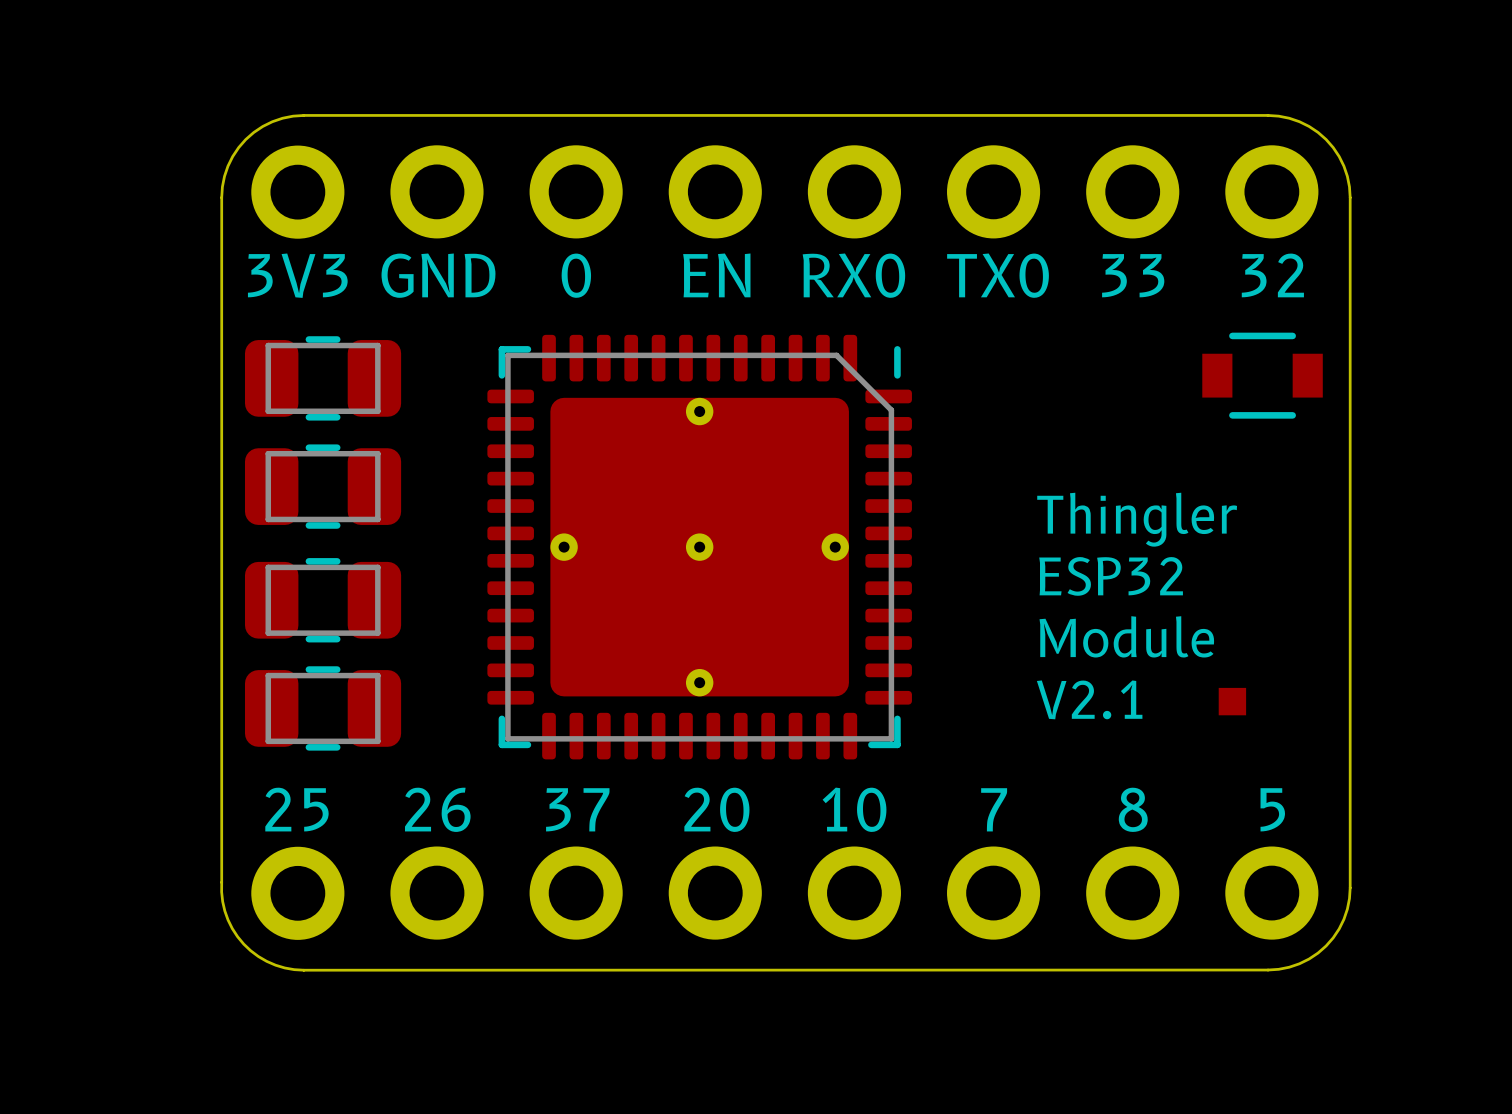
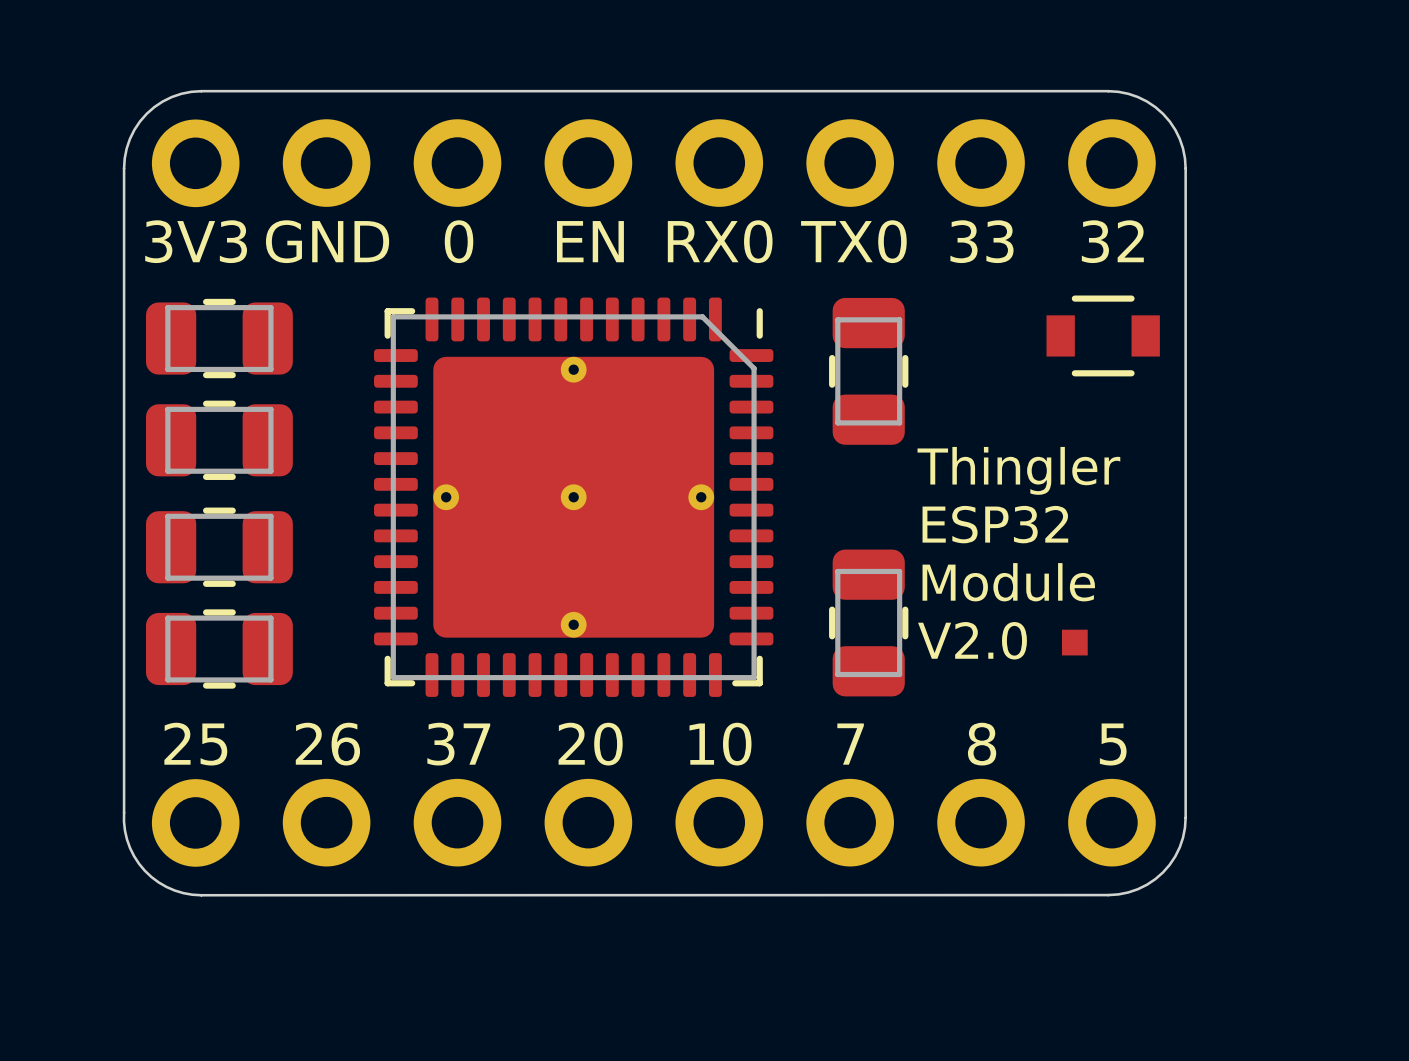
part: none -> (868, 371)
text position: Thingler (1137, 519) -> Thingler (1018, 470)
text position: ESP32 (1111, 576) -> ESP32 (995, 524)
text position: Module (1126, 636) -> Module (1008, 582)
part: none -> (868, 622)
text: V2.1 (1089, 699) -> V2.0 (972, 640)

